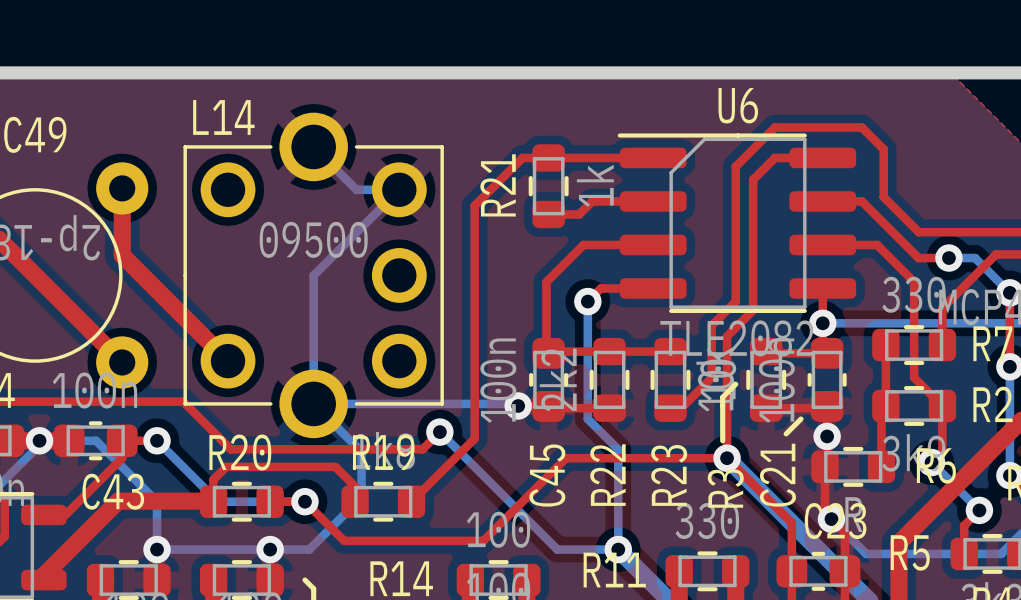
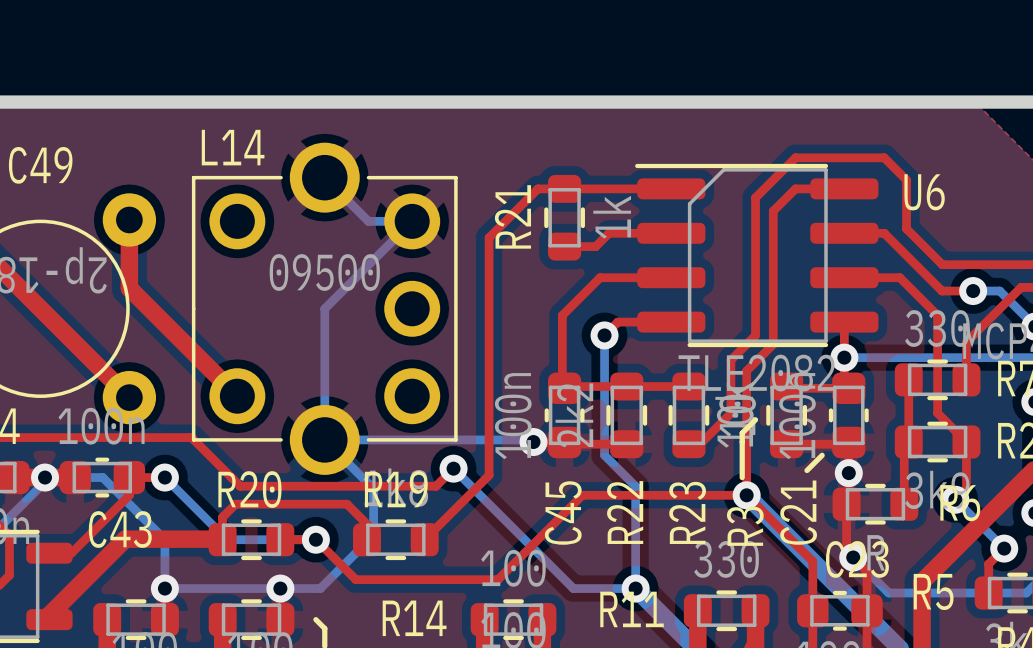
U6 name position: U6 (738, 105) -> U6 (924, 192)

